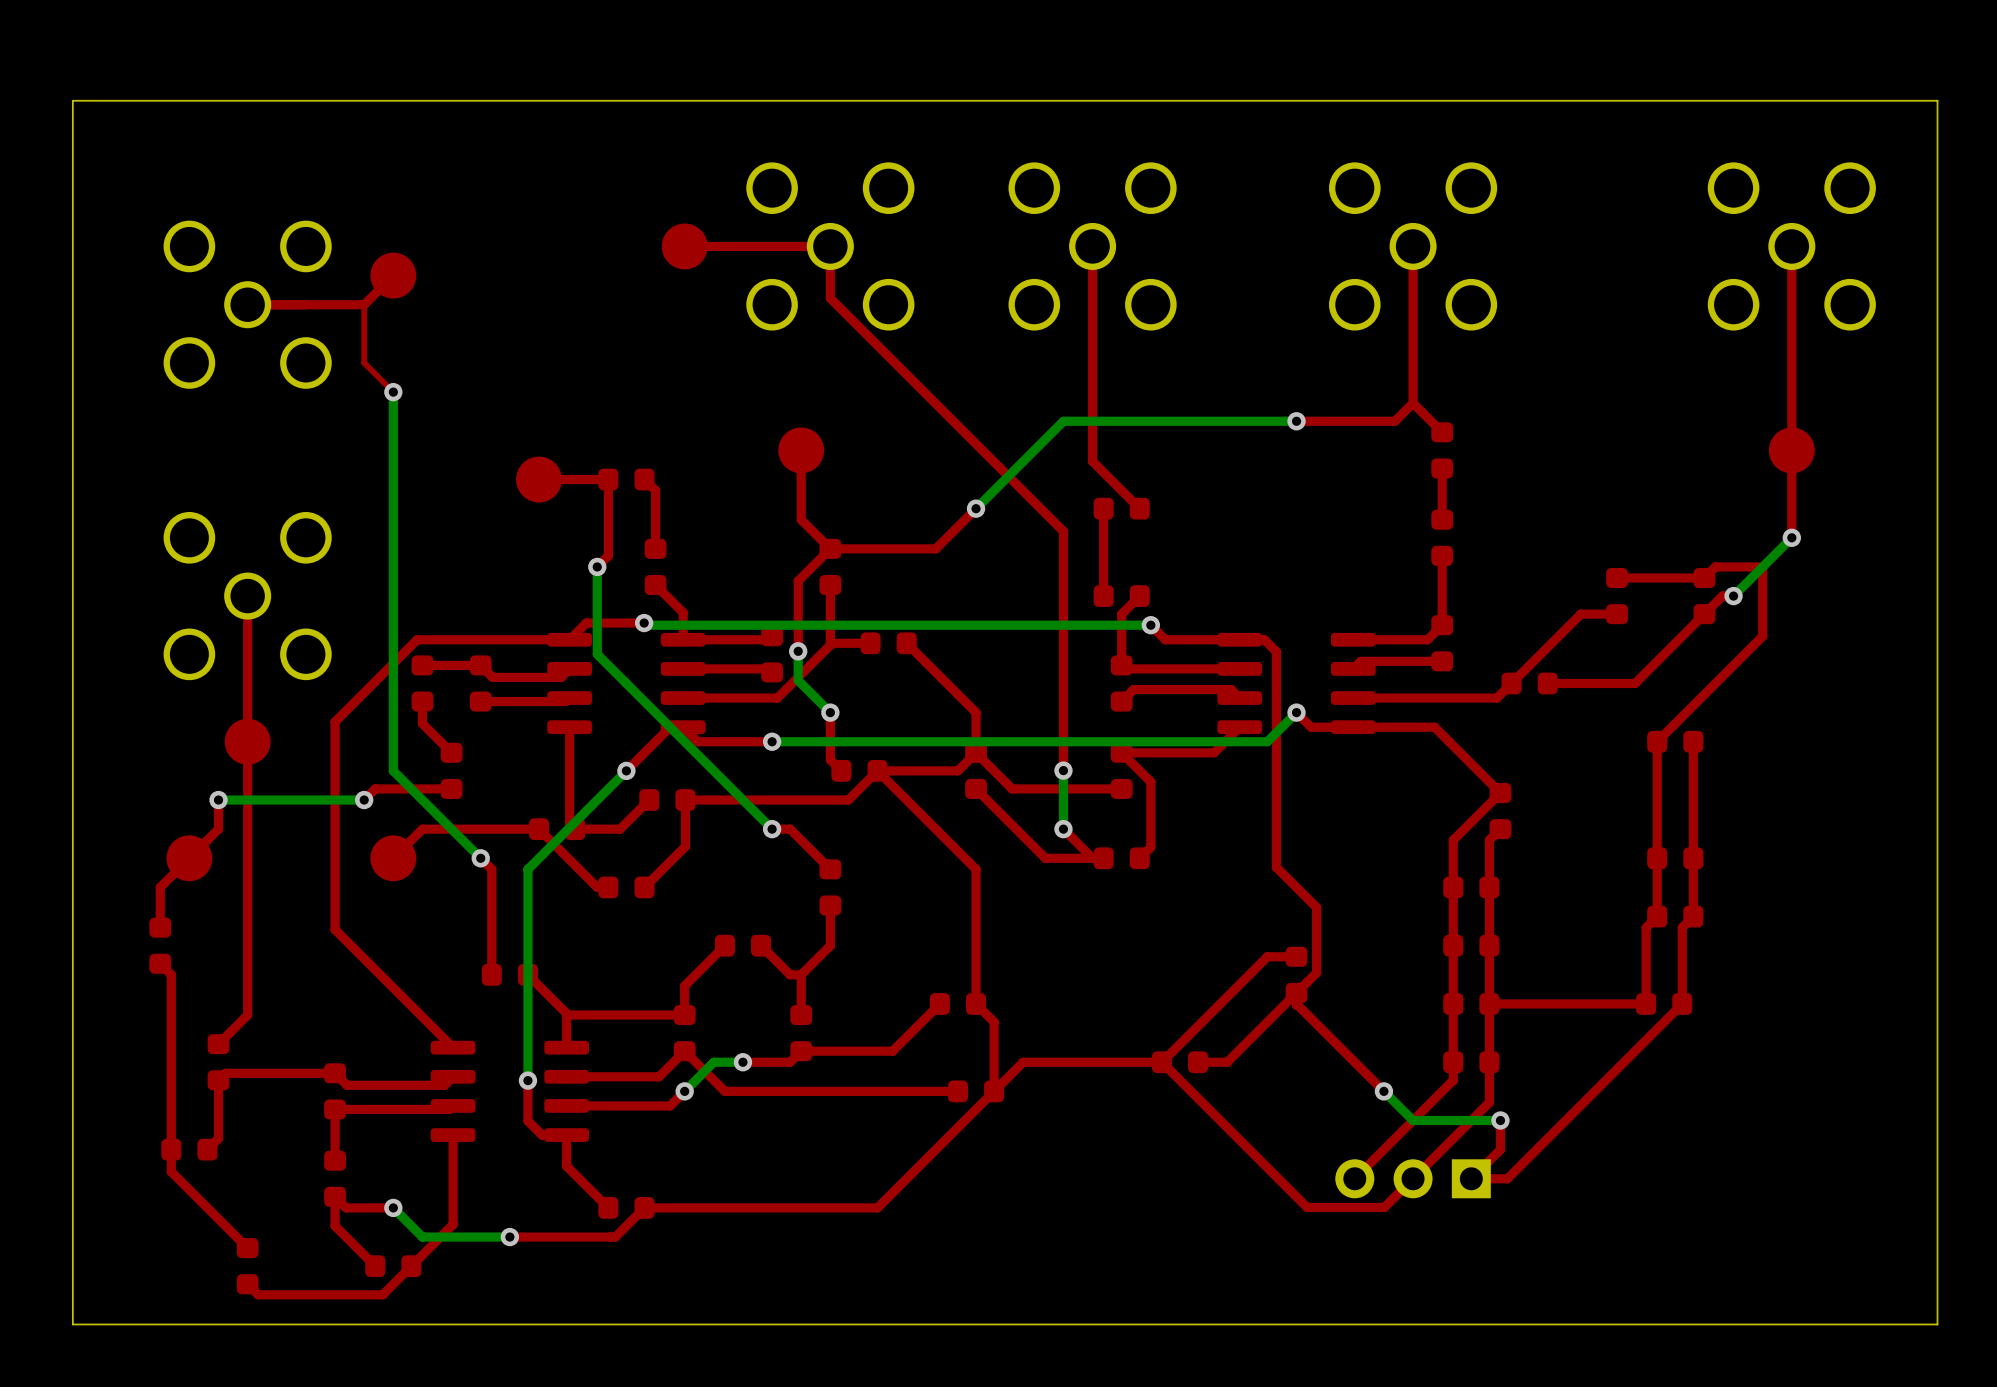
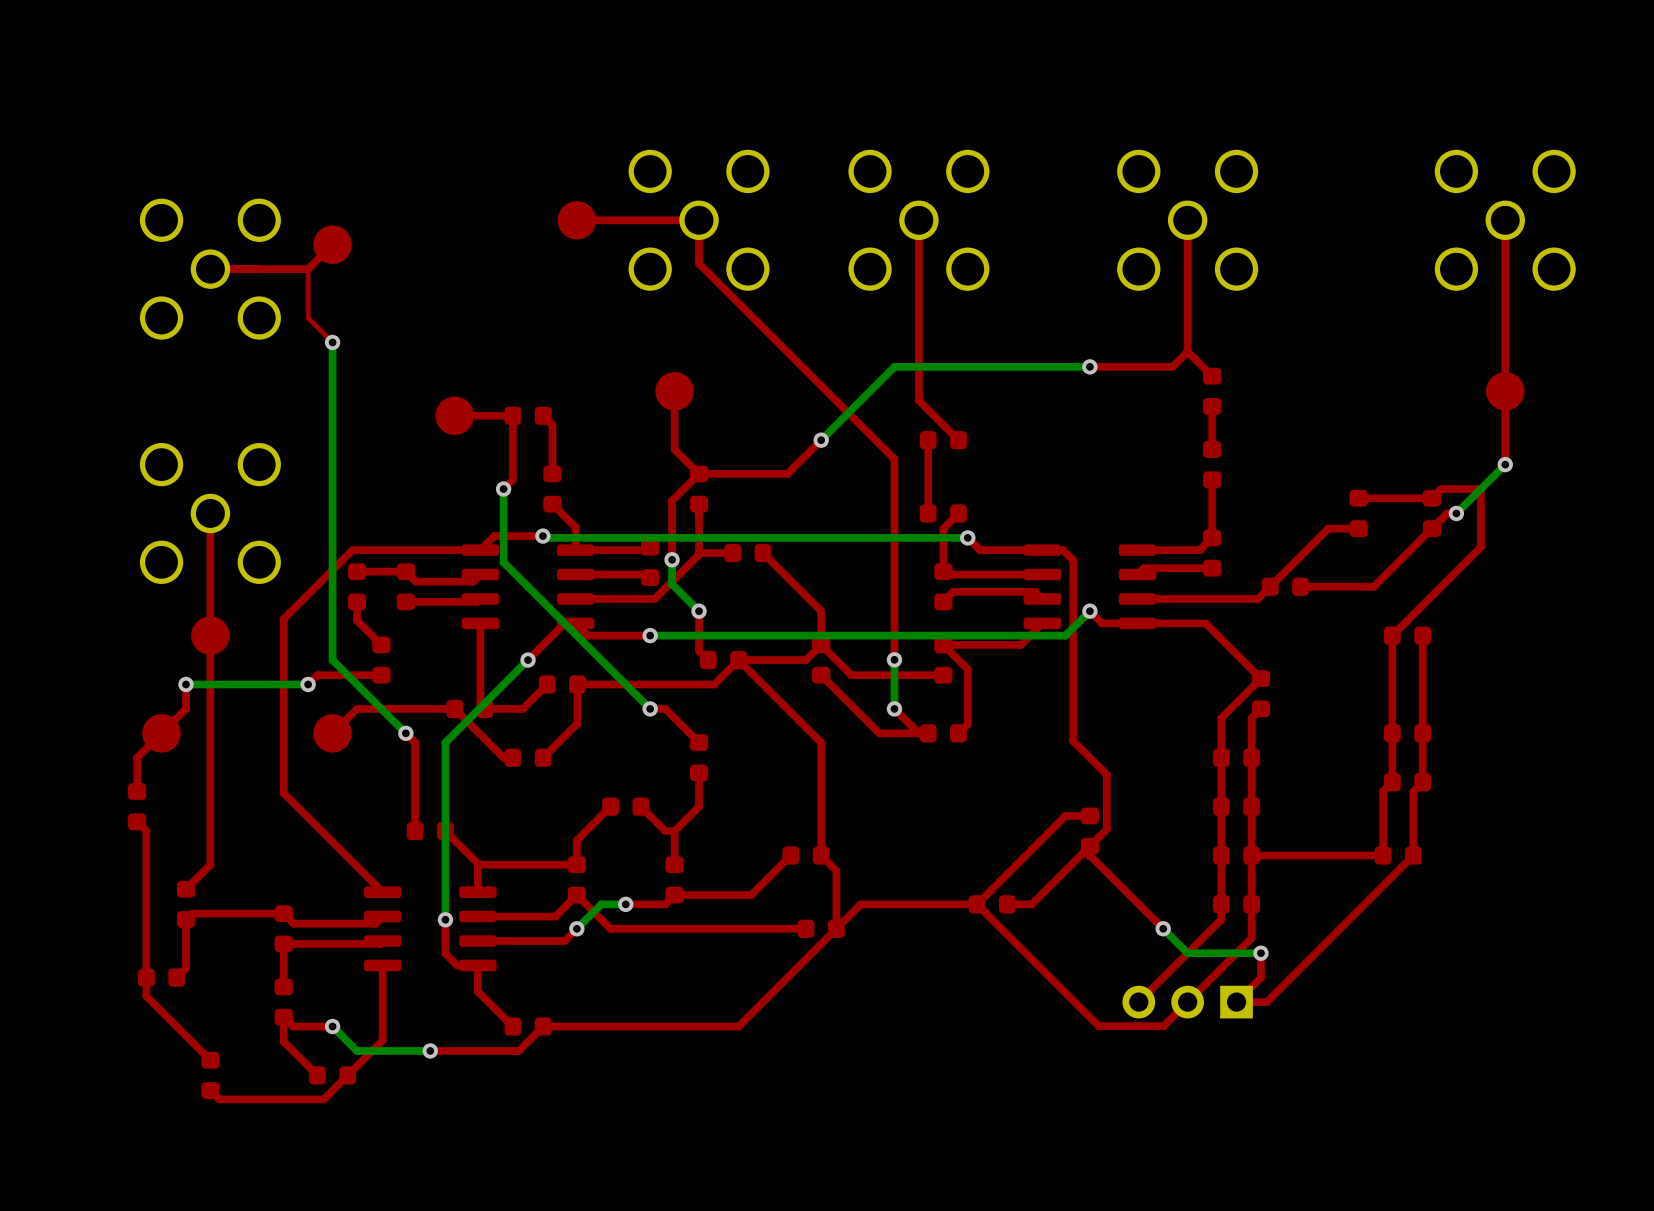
board edge: (1937, 100) (72, 100) (72, 1324) (1937, 1324) (1937, 100) -> none

